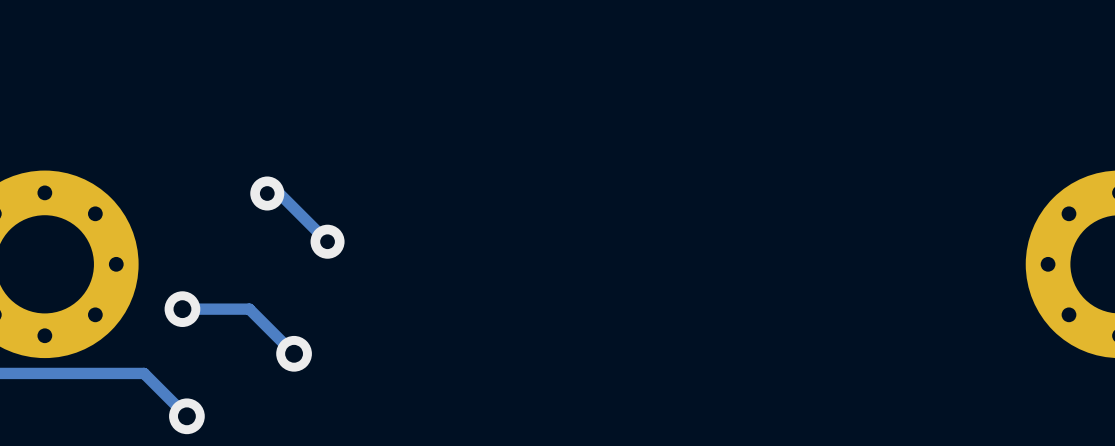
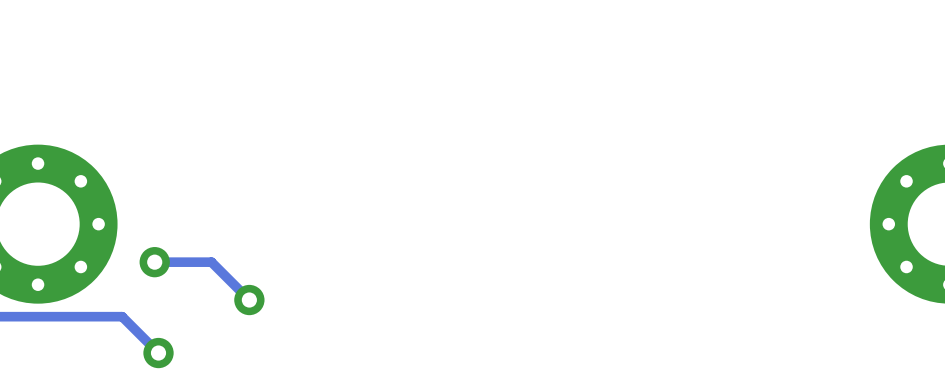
track: (267, 193) (279, 193) (327, 241) -> none
via: (267, 193) -> none
via: (327, 241) -> none

